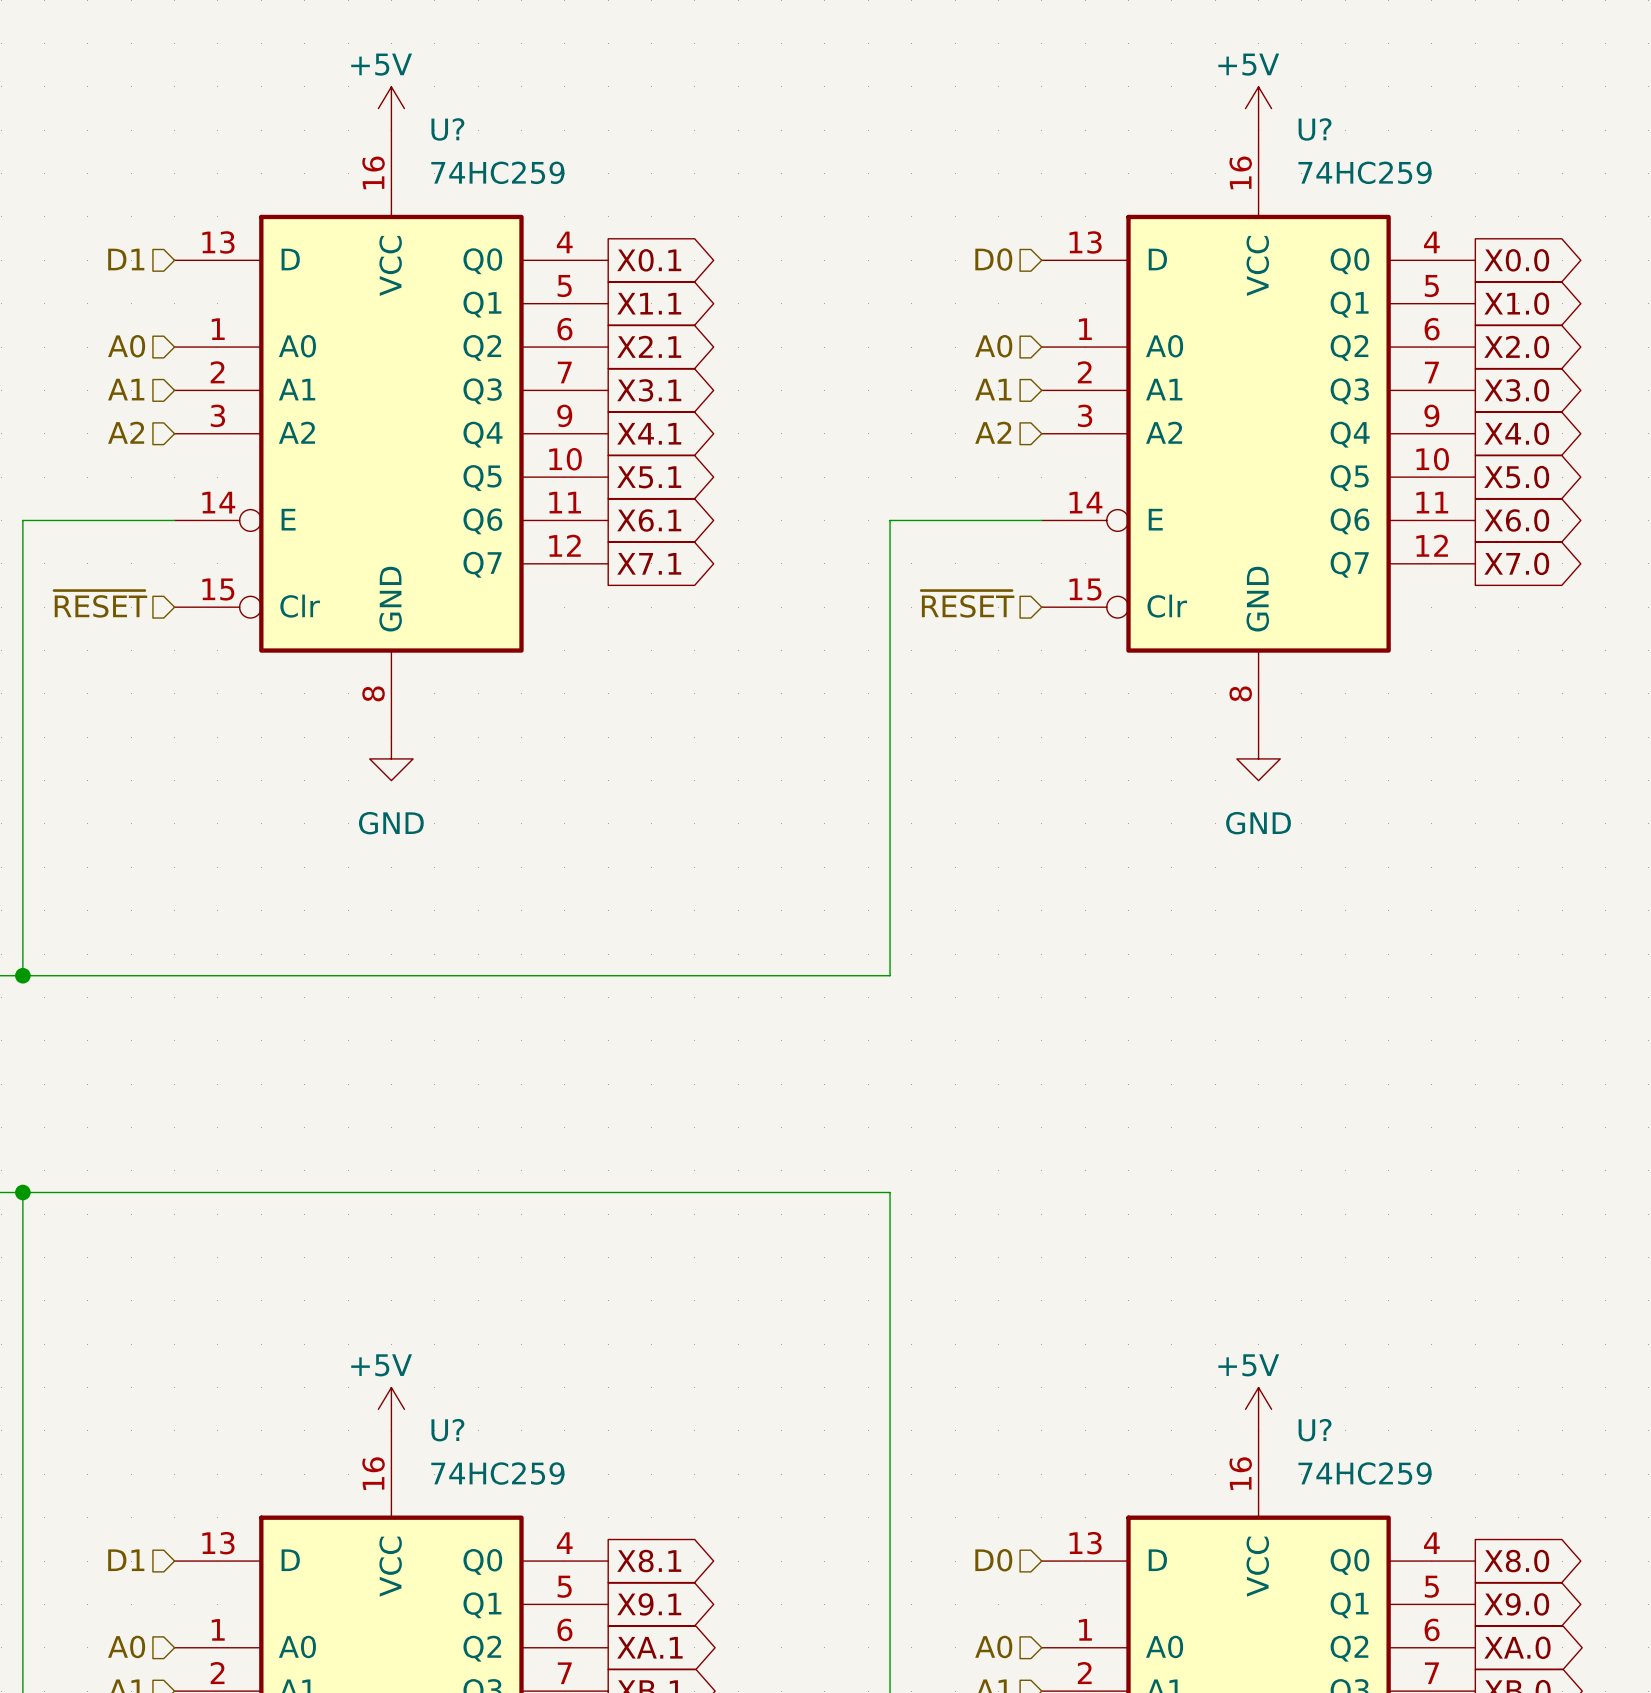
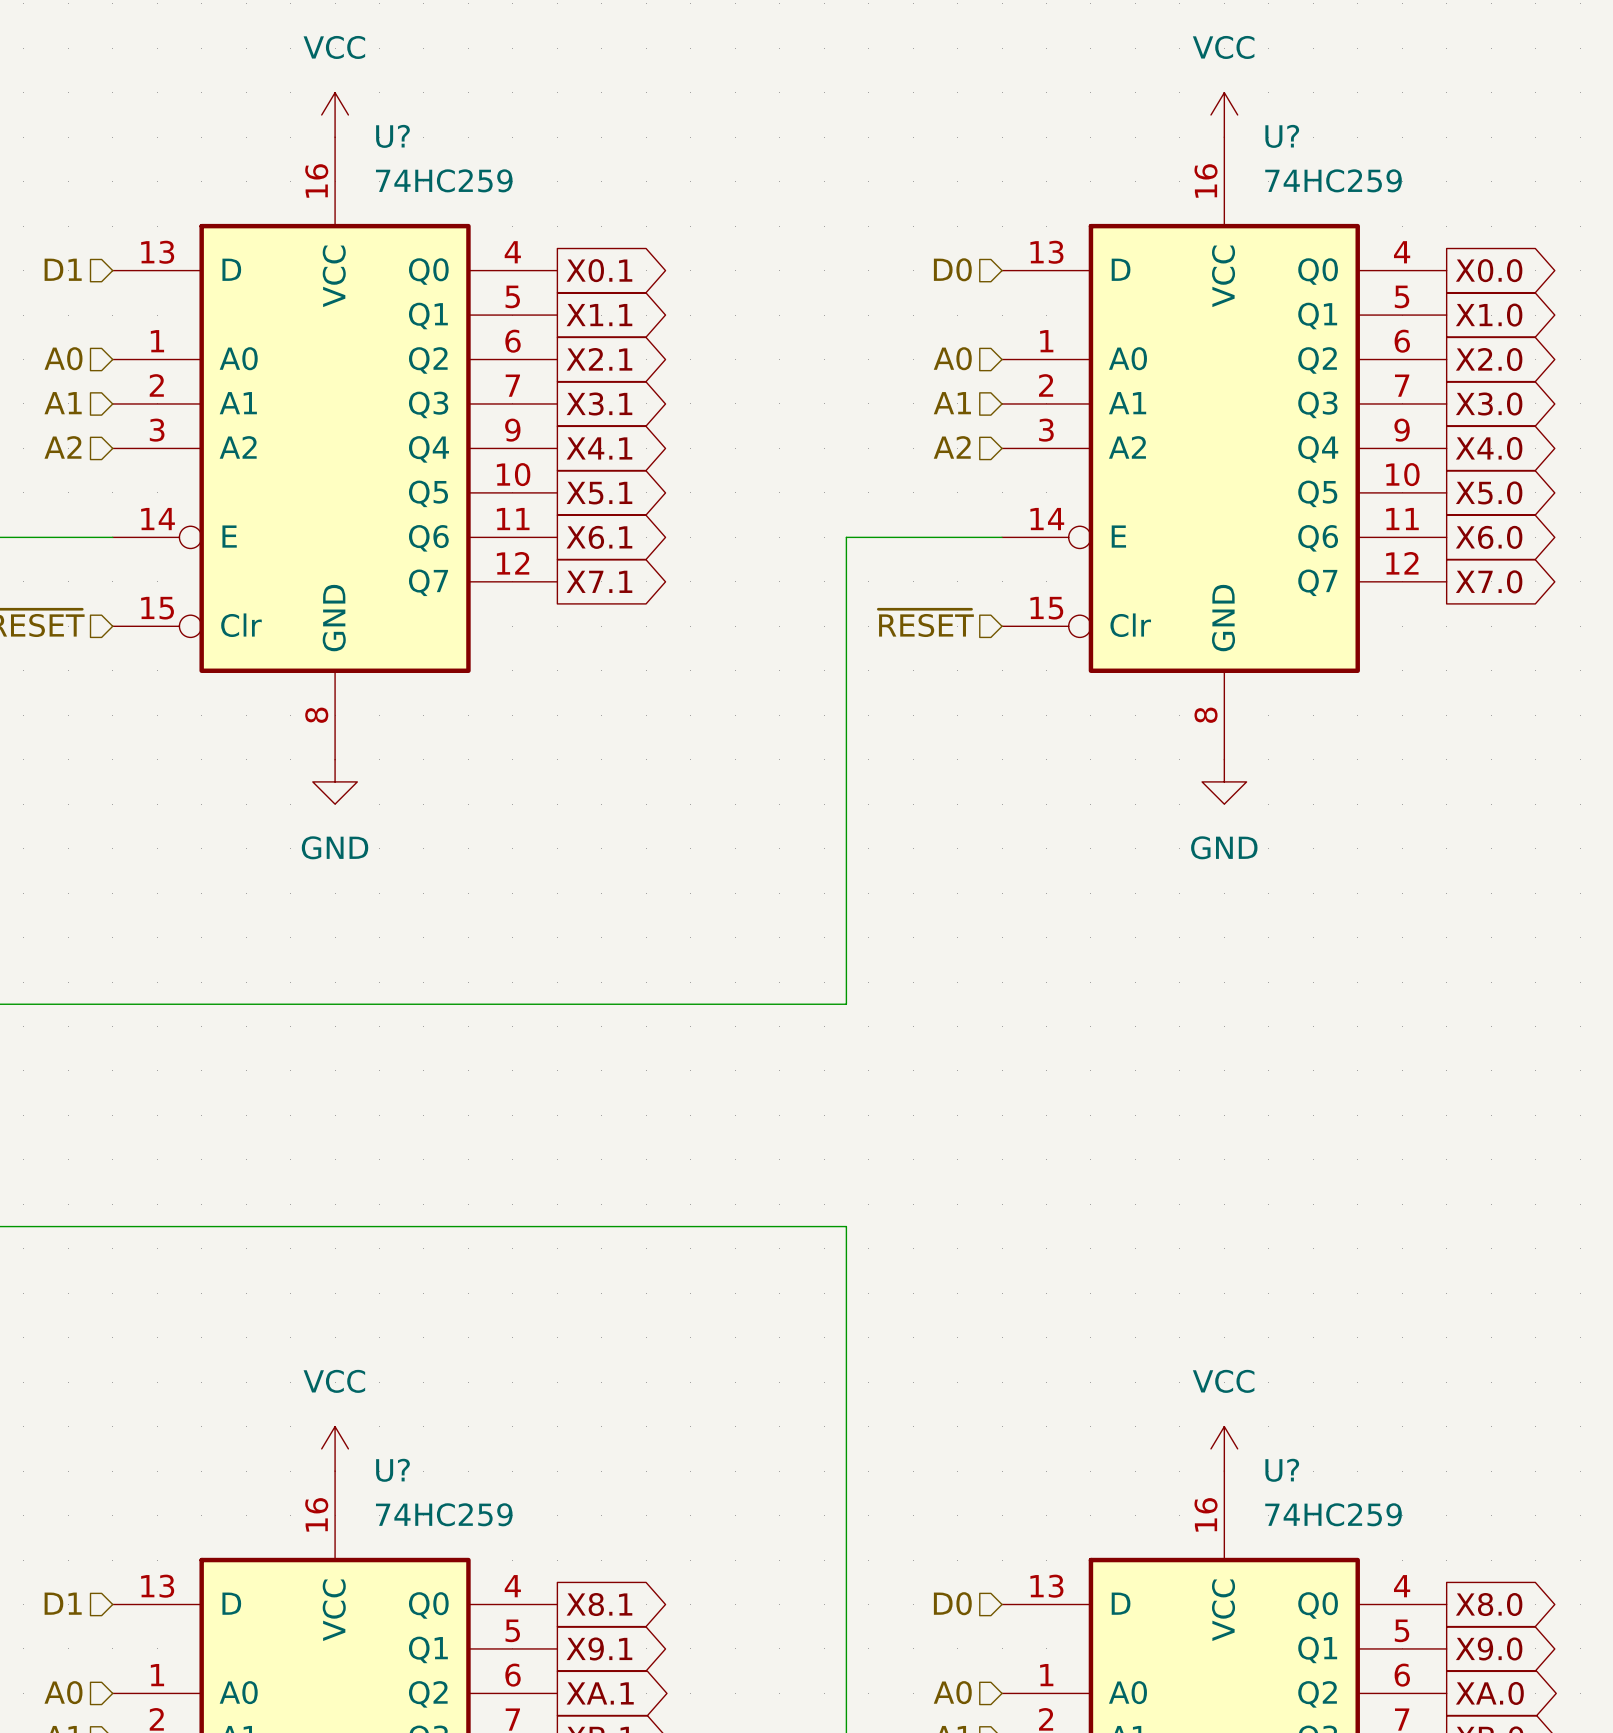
power symbol: +5V (391, 108) -> VCC (335, 114)
power symbol: +5V (1258, 108) -> VCC (1224, 114)
power symbol: +5V (391, 1409) -> VCC (335, 1448)
power symbol: +5V (1258, 1409) -> VCC (1224, 1448)

